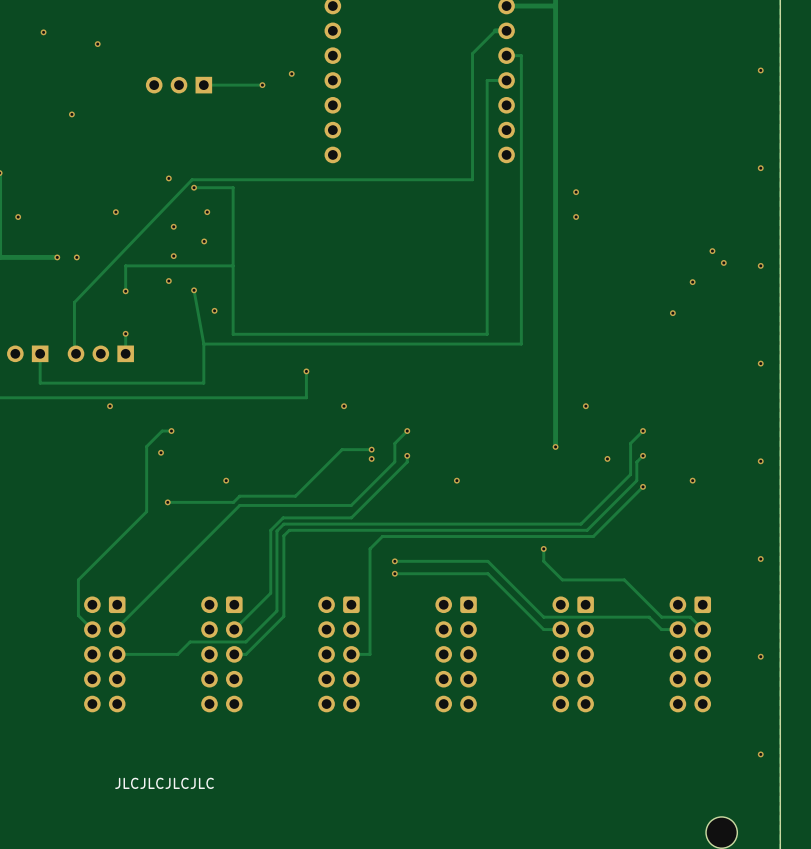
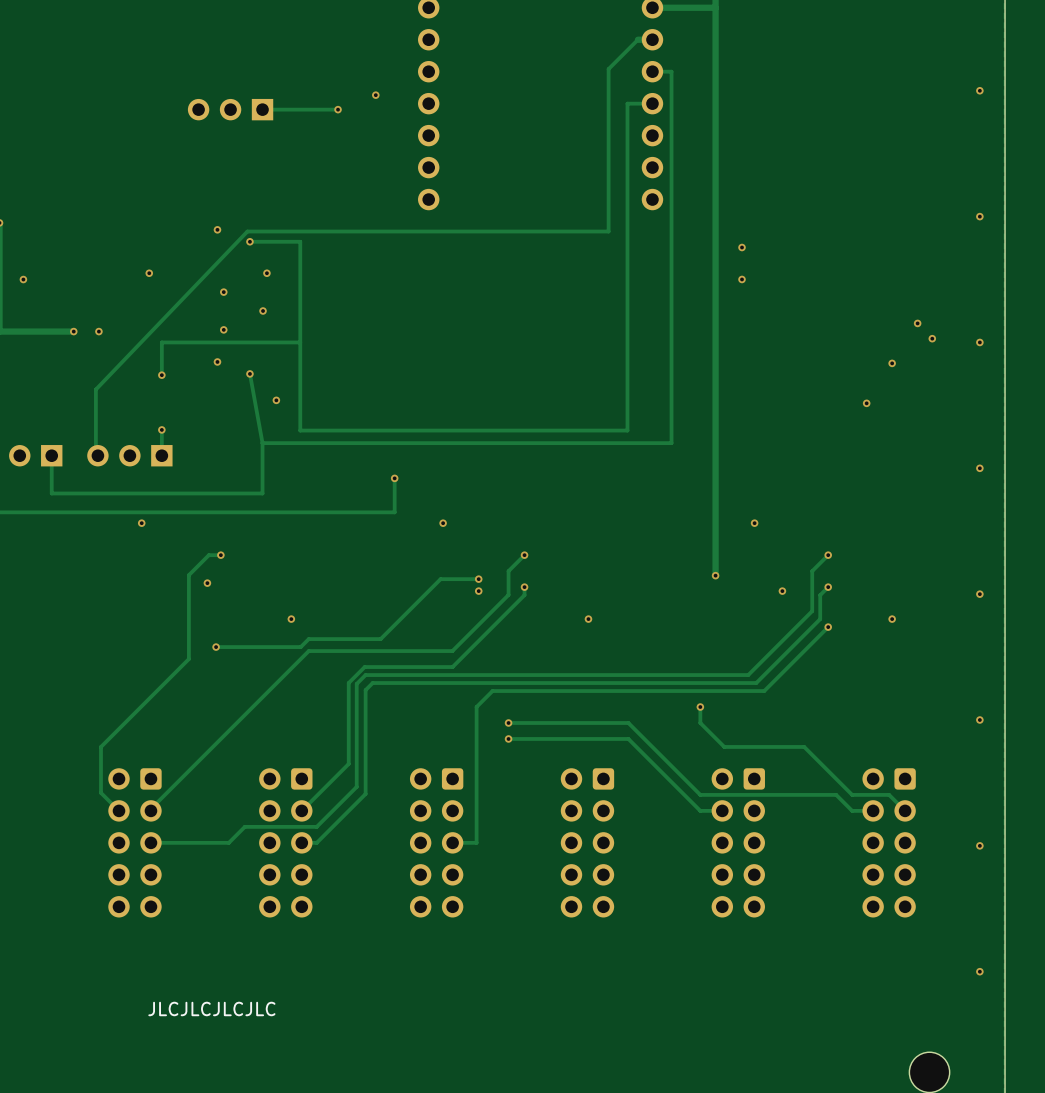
via: (43, 32) -> none
via: (97, 44) -> none
via: (71, 114) -> none

